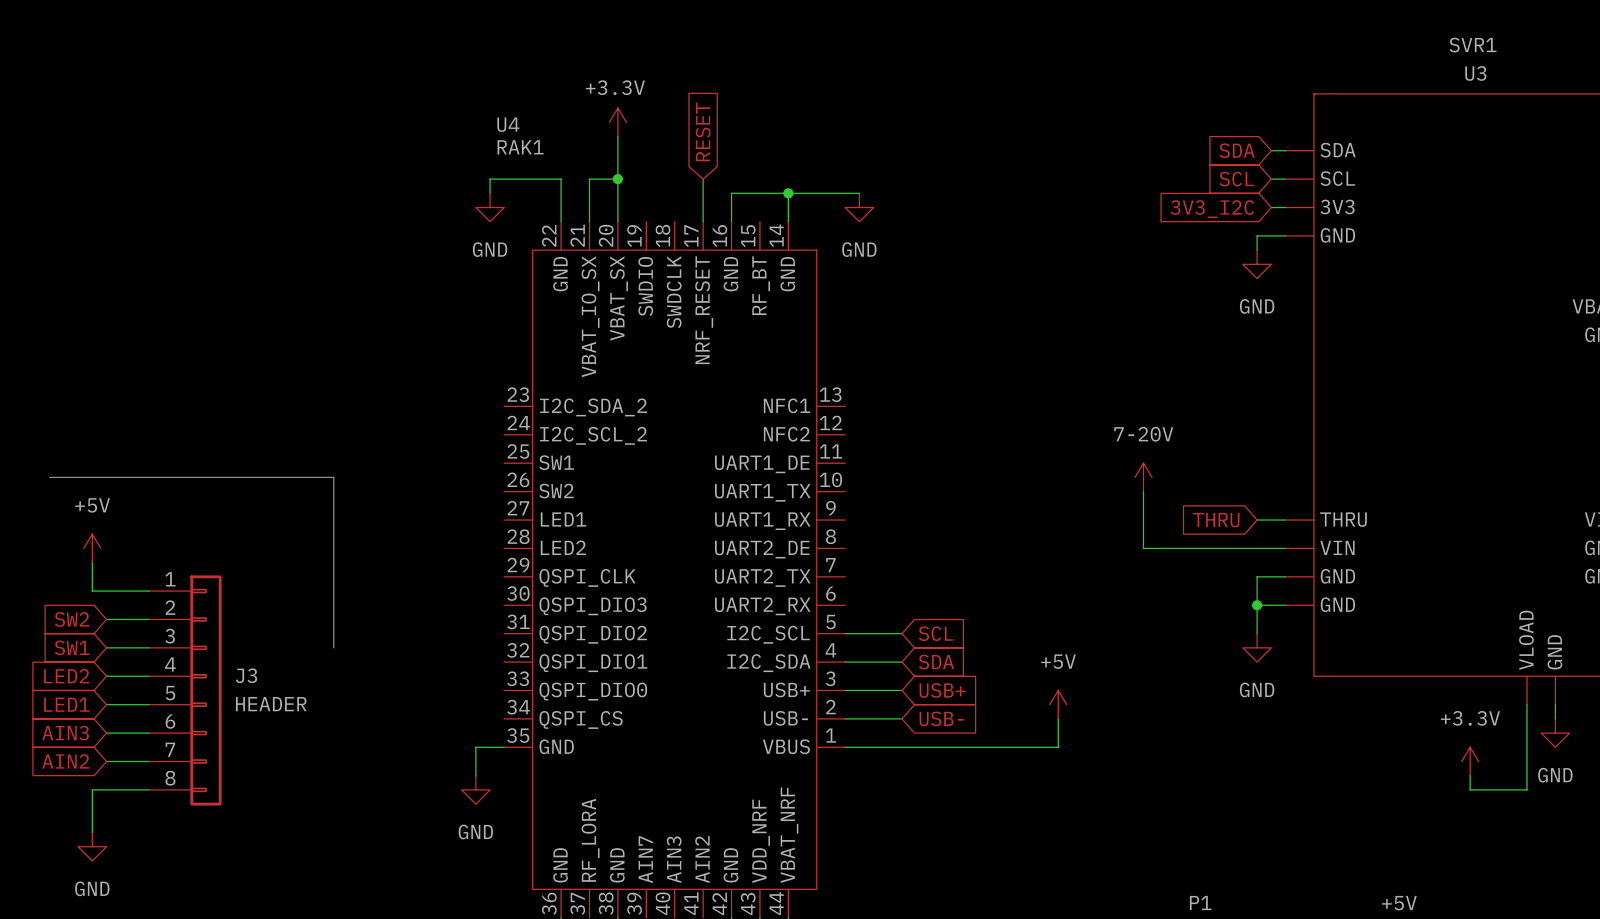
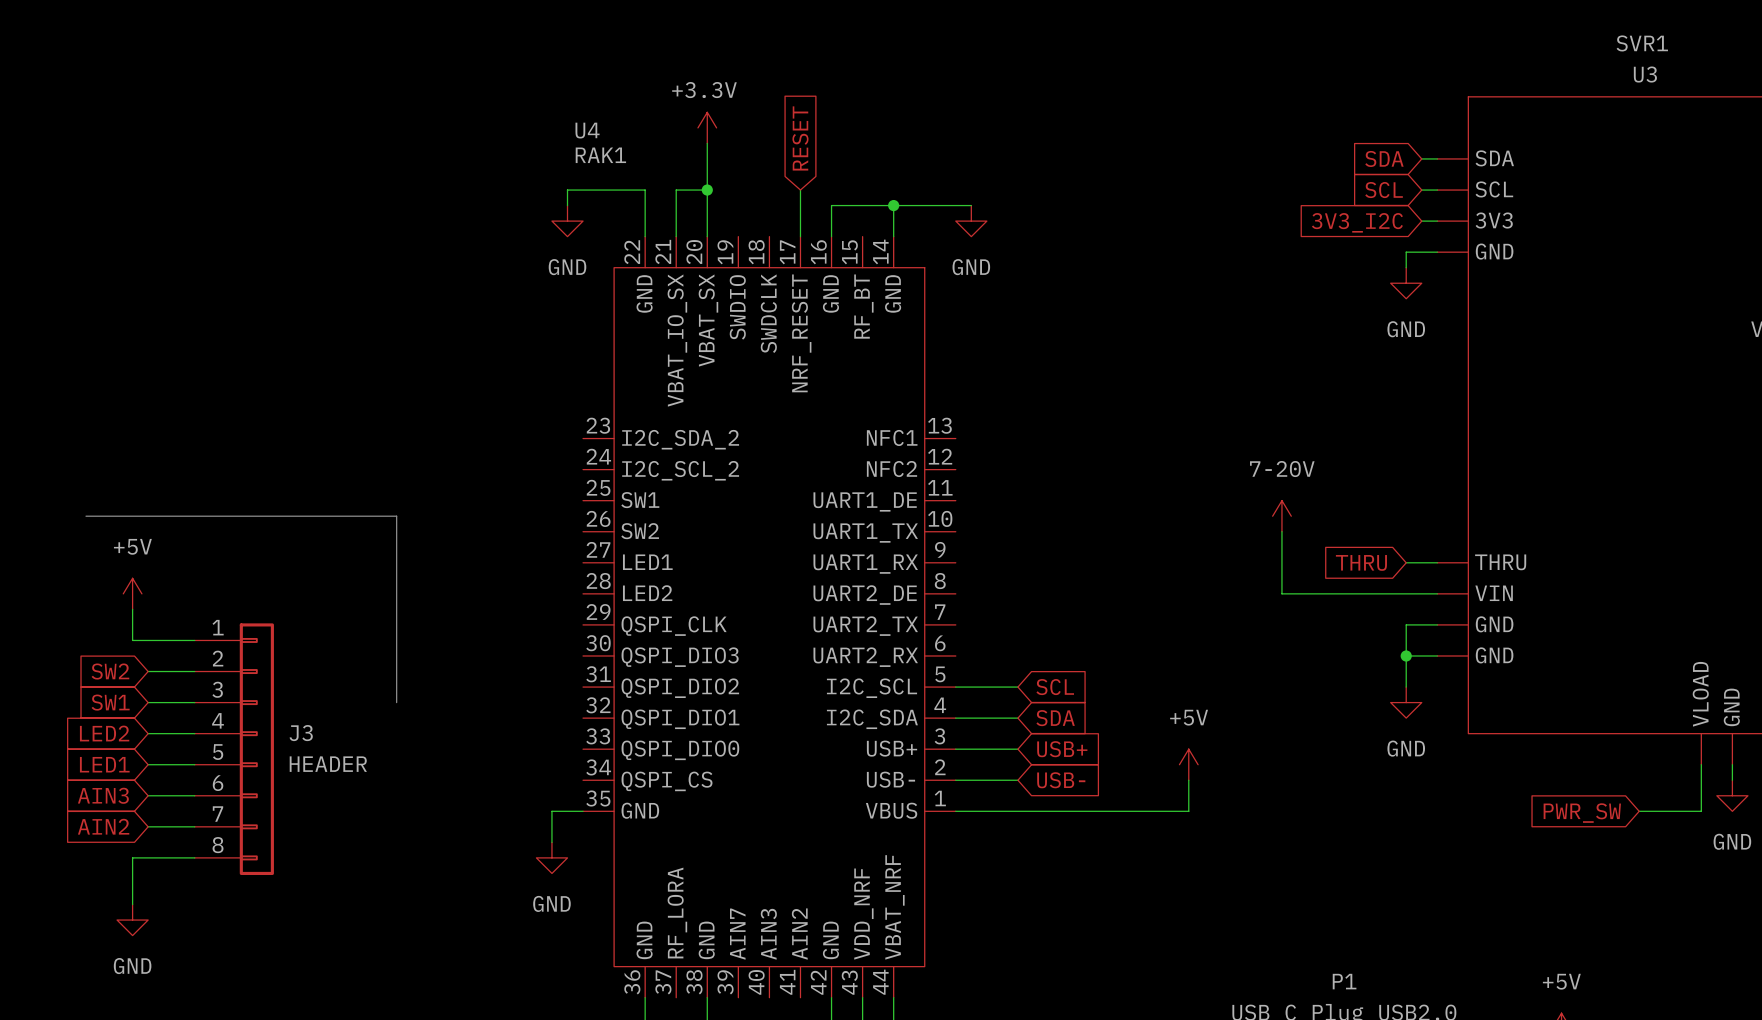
wire: (1526, 747) (1526, 789) (1470, 789) (1470, 775) -> (1701, 811) (1639, 811)
global label: none -> PWR_SW (1582, 813)
power symbol: +3.3V (1470, 761) -> none

